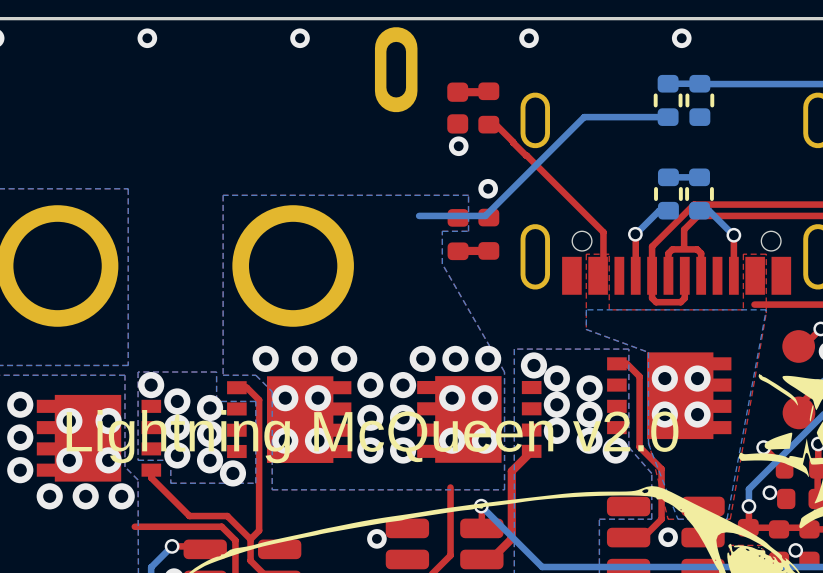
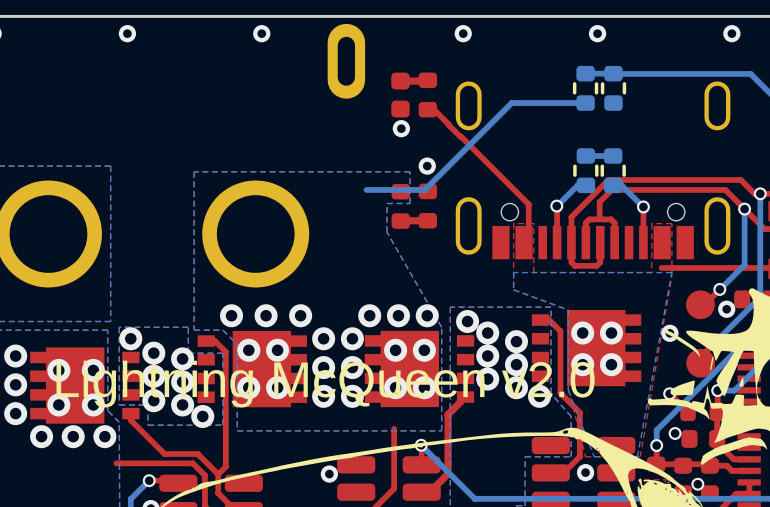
via: none -> (669, 333)

